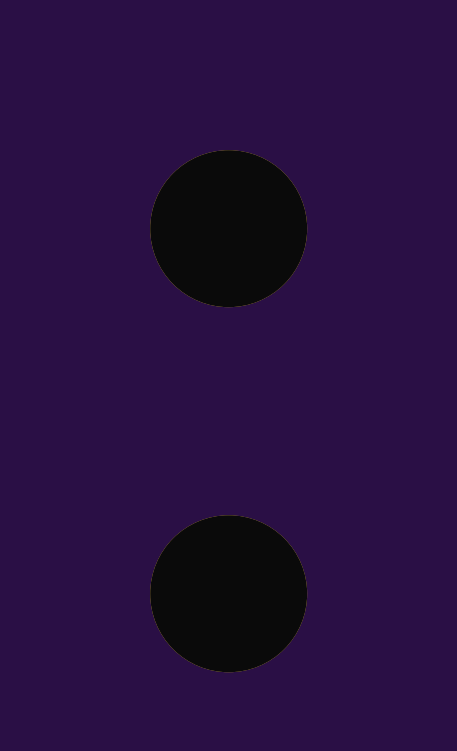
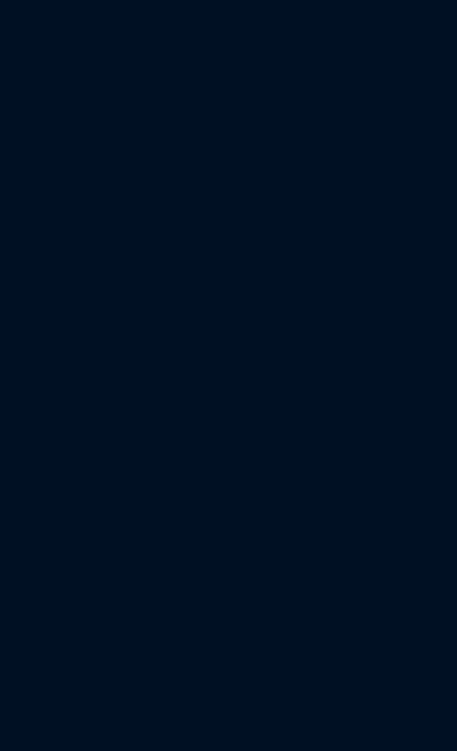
part: (228, 228) -> none
part: (228, 593) -> none

